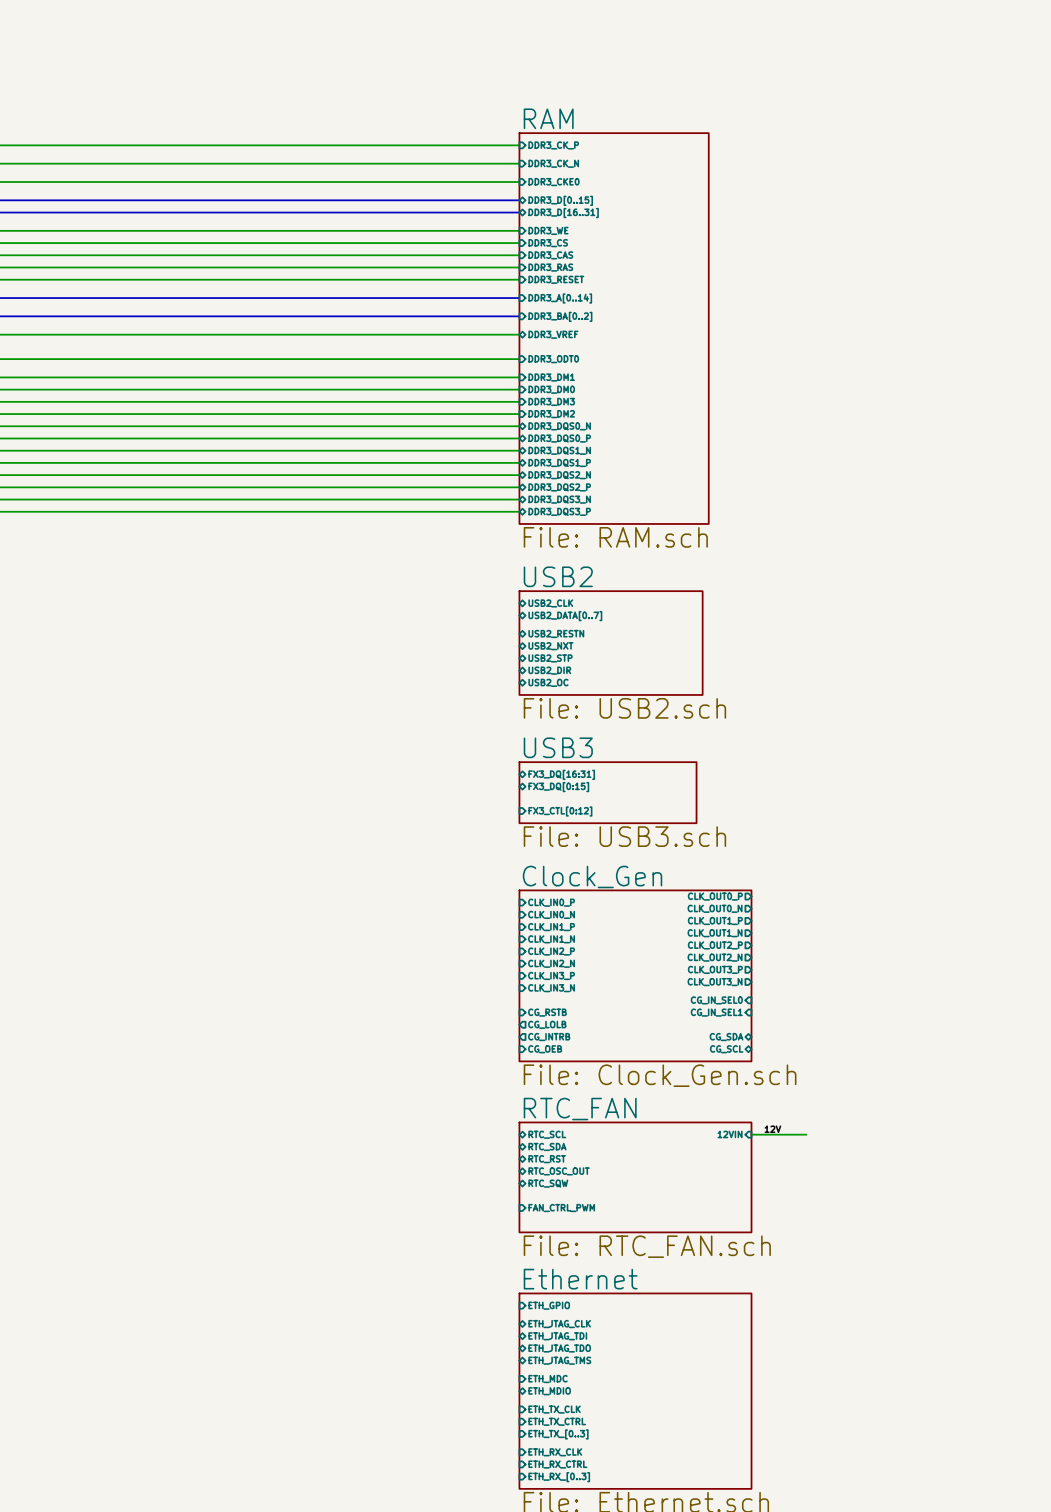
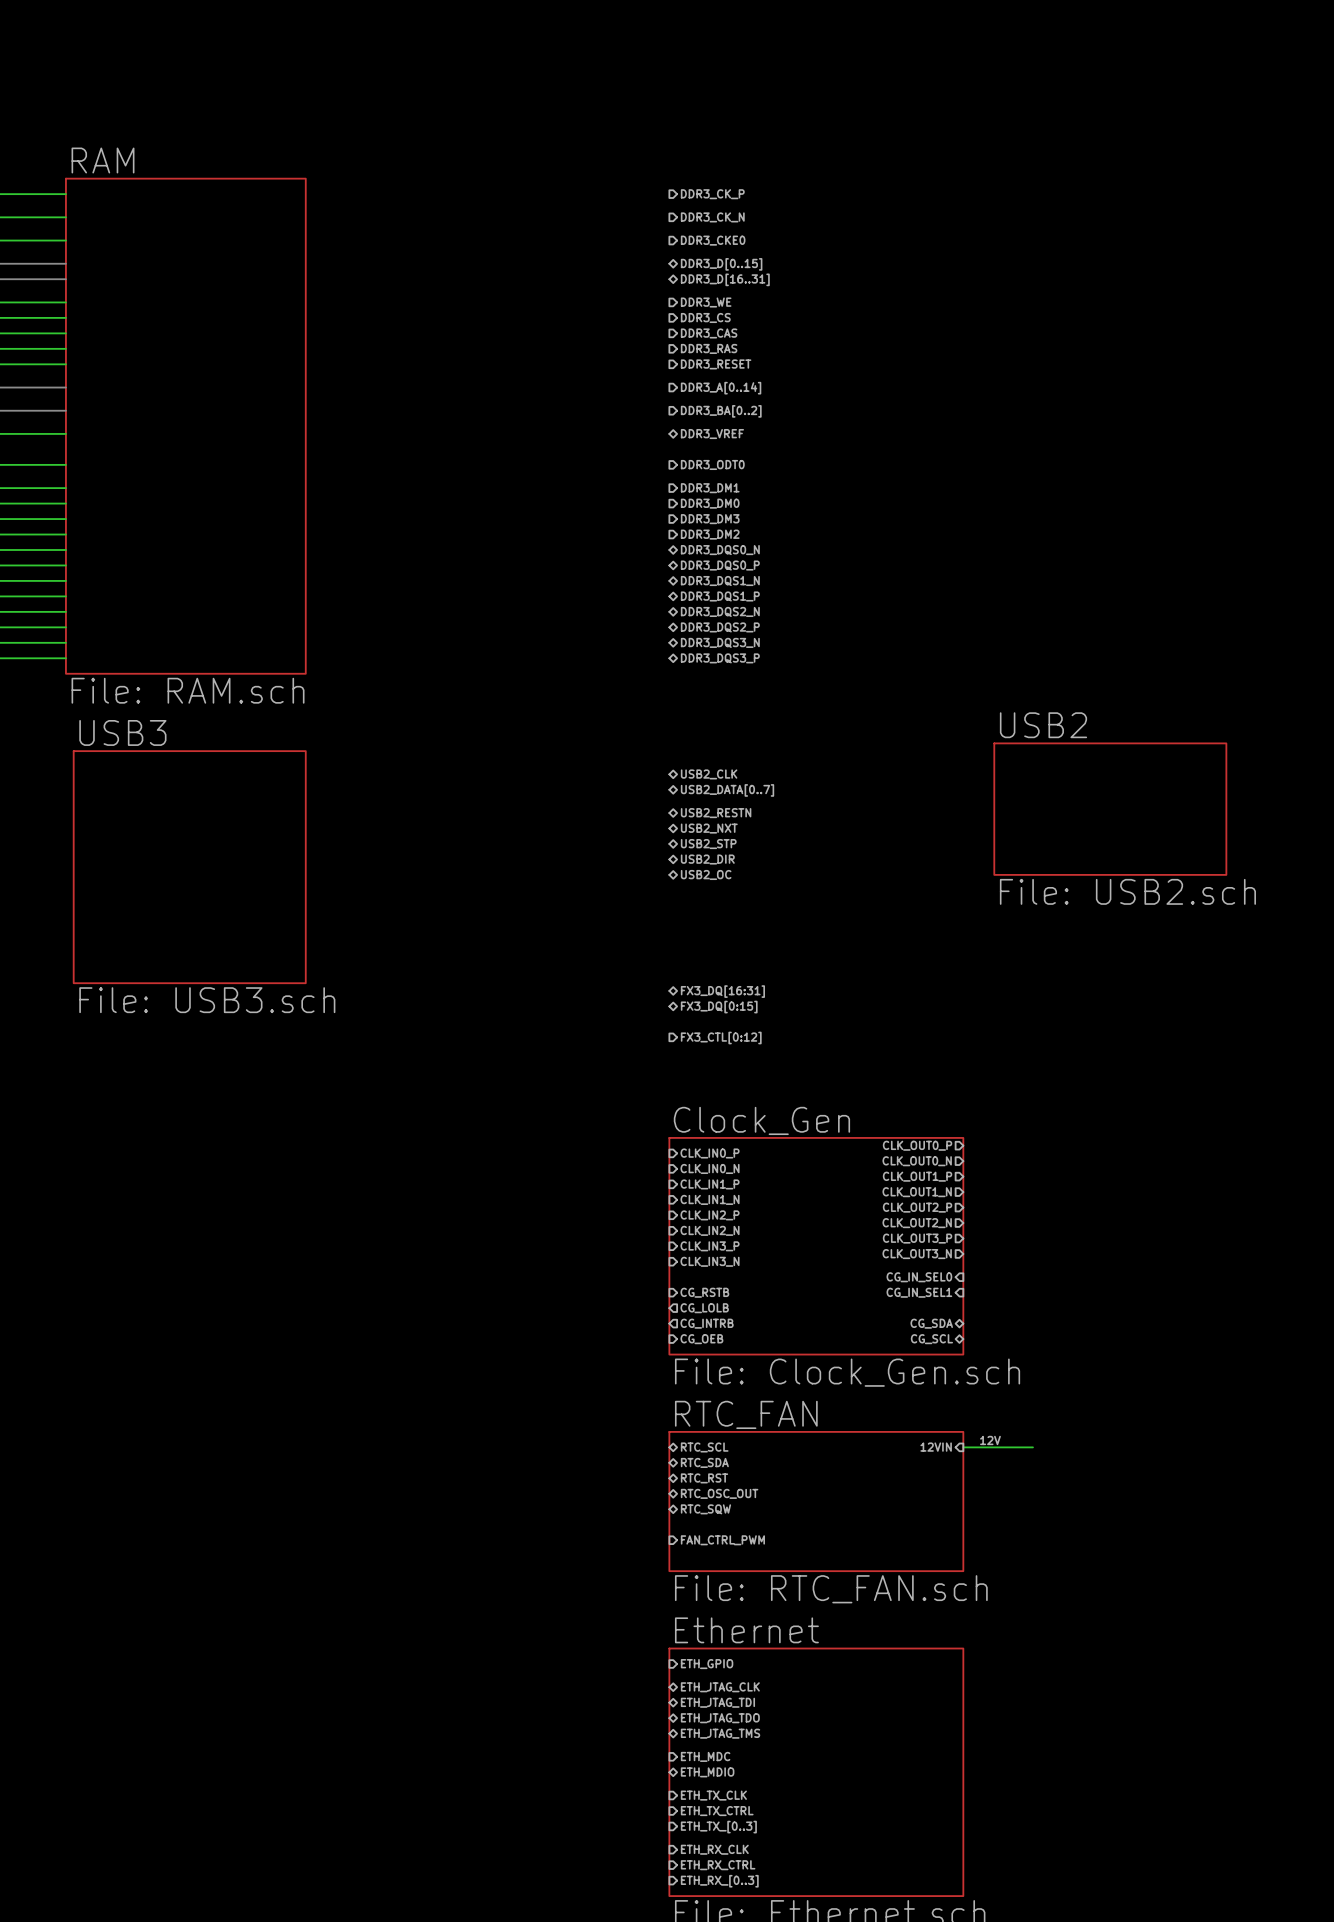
wire: (43, 145) (519, 145) -> none
wire: (43, 163) (519, 163) -> none
wire: (43, 182) (519, 182) -> none
bus: (43, 200) (519, 200) -> none
bus: (43, 212) (519, 212) -> none
wire: (43, 230) (519, 230) -> none
wire: (43, 243) (519, 243) -> none
wire: (43, 255) (519, 255) -> none
wire: (43, 267) (519, 267) -> none
wire: (43, 279) (519, 279) -> none
bus: (43, 298) (519, 298) -> none
bus: (43, 316) (519, 316) -> none
sheet RAM: none -> File: RAM.sch (185, 426)
sheet RAM: File: RAM.sch (614, 328) -> none
wire: (43, 334) (519, 334) -> none
wire: (43, 359) (519, 359) -> none
wire: (43, 377) (519, 377) -> none
wire: (43, 389) (519, 389) -> none
wire: (43, 401) (519, 401) -> none
wire: (43, 414) (519, 414) -> none
wire: (43, 426) (519, 426) -> none
wire: (43, 438) (519, 438) -> none
wire: (43, 450) (519, 450) -> none
wire: (43, 462) (519, 462) -> none
wire: (43, 475) (519, 475) -> none
wire: (43, 487) (519, 487) -> none
wire: (43, 499) (519, 499) -> none
wire: (43, 511) (519, 511) -> none
sheet USB2 position: (611, 643) -> (1110, 809)
sheet USB3 name position: USB3 (558, 747) -> USB3 (122, 732)
sheet USB3 shape: [519, 762, 697, 824] -> [73, 751, 306, 984]
sheet USB3 value position: File: USB3.sch (624, 836) -> File: USB3.sch (207, 1000)

